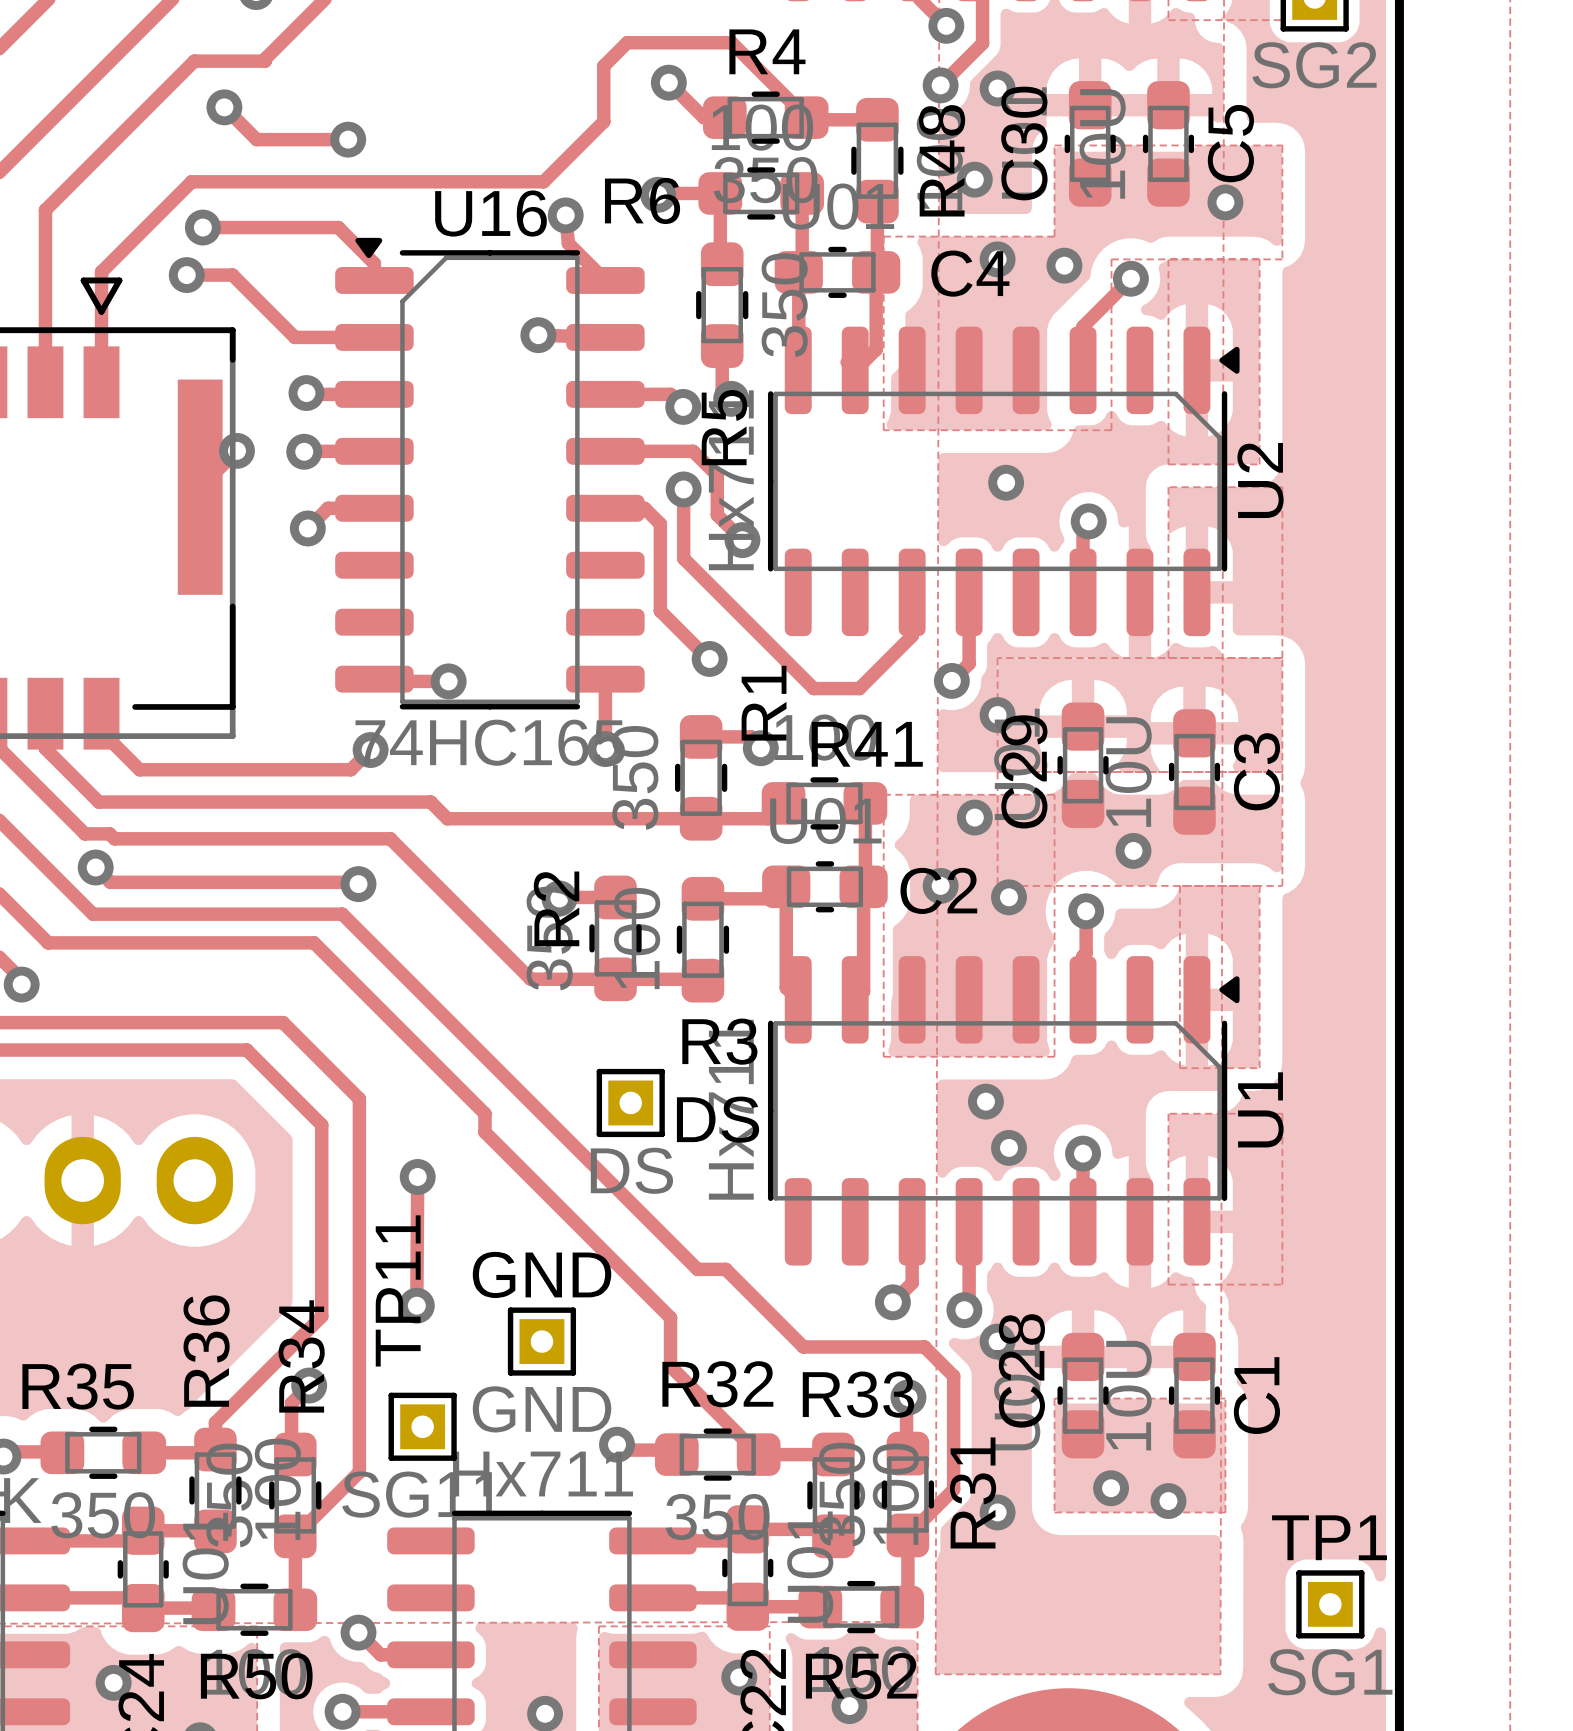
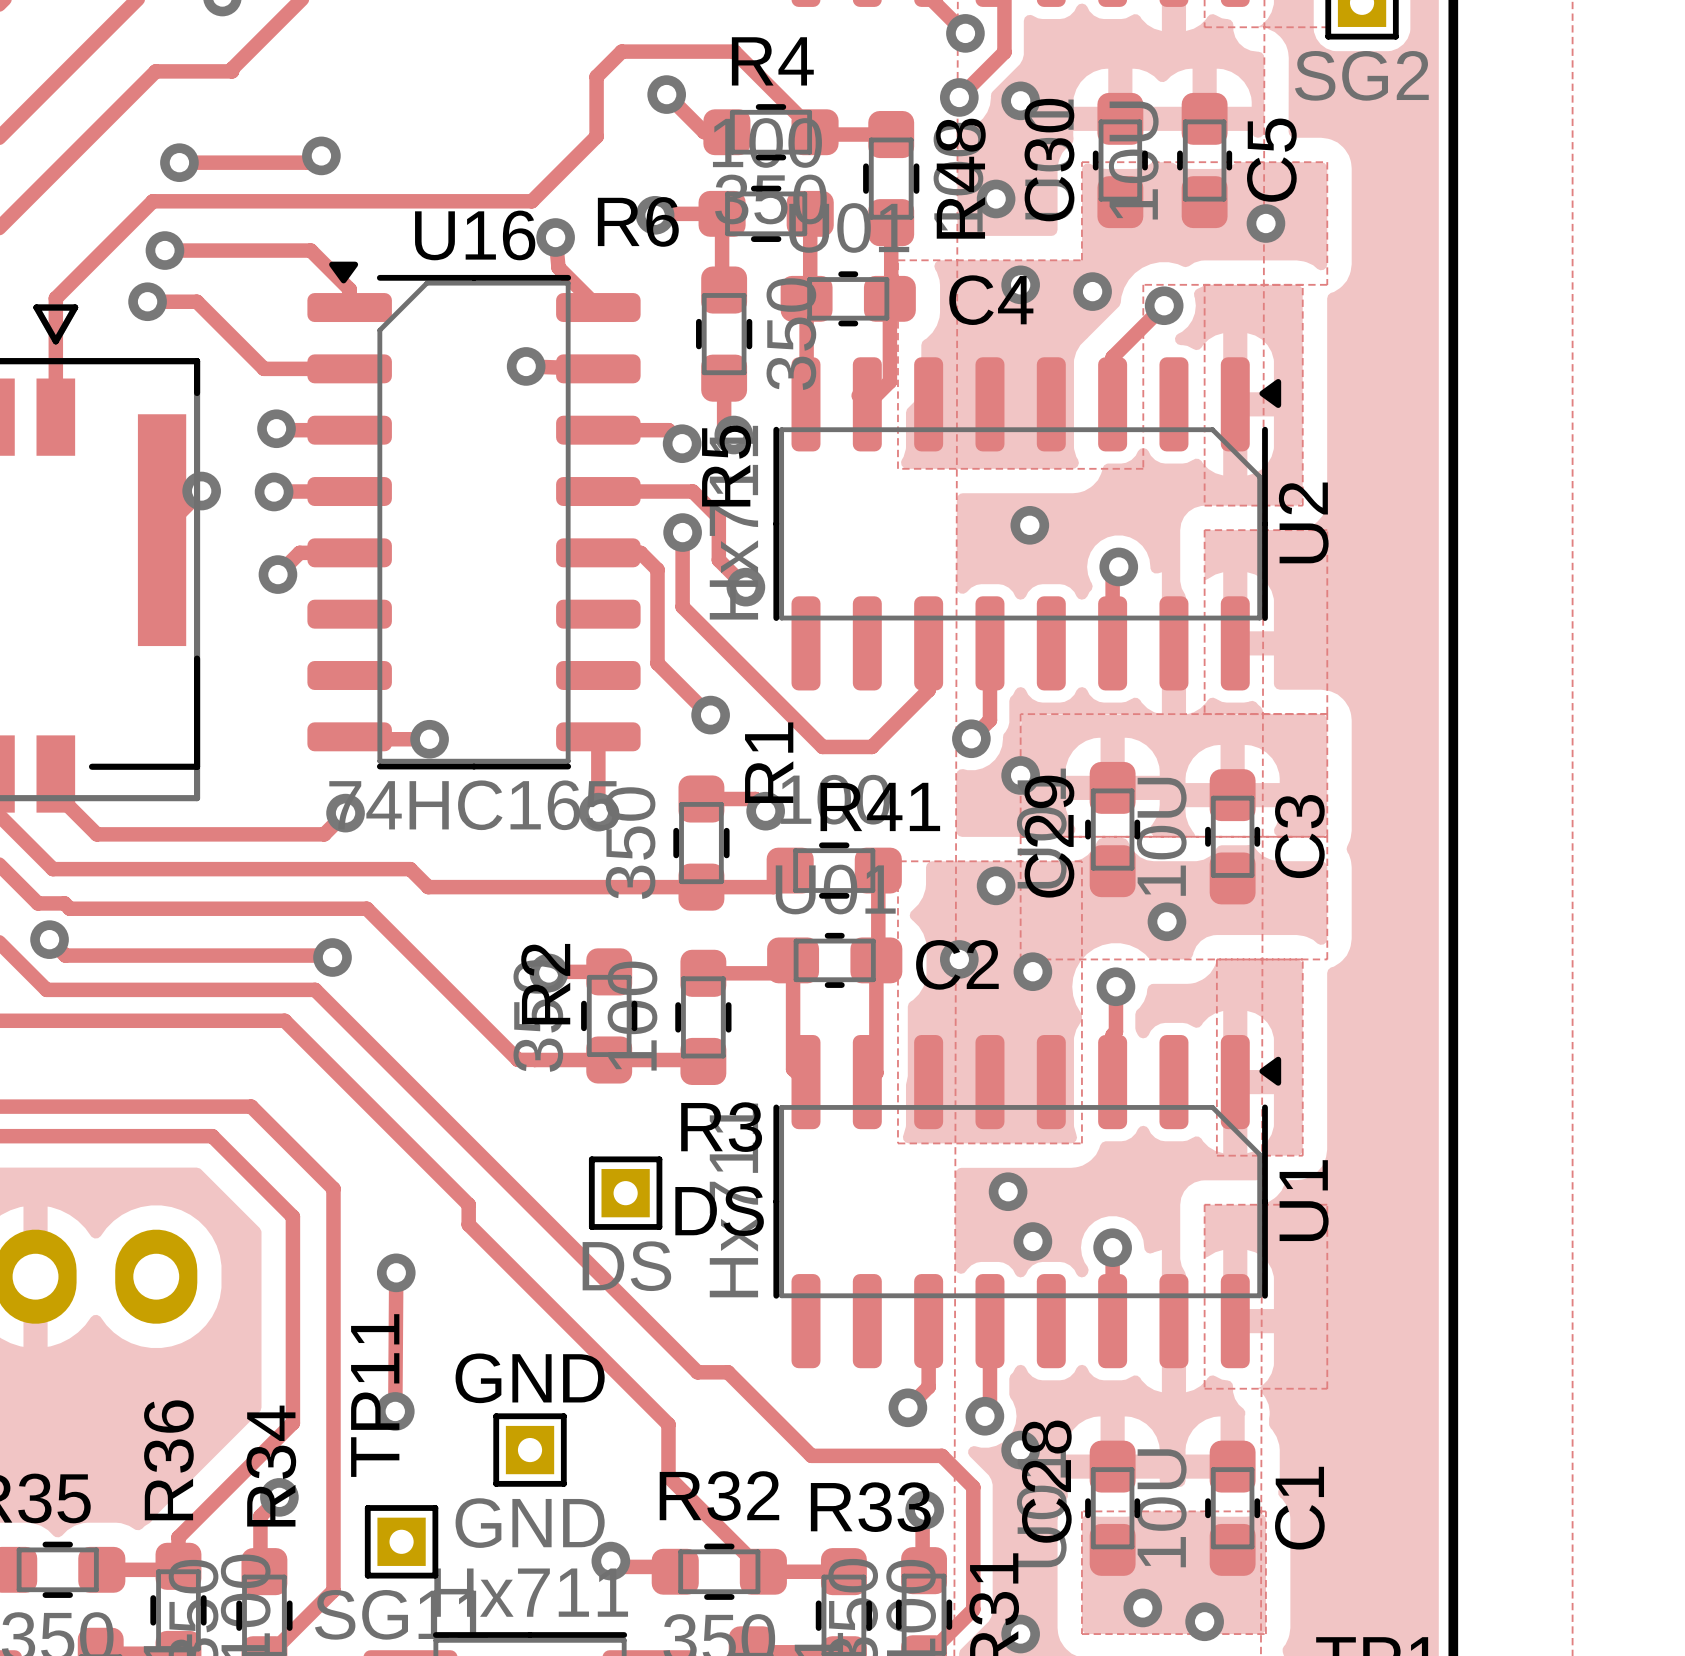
track: (224, 107) (256, 139) (348, 139) -> none
via position: (224, 107) -> (179, 162)
track: none -> (321, 149) (308, 162) (179, 162)

